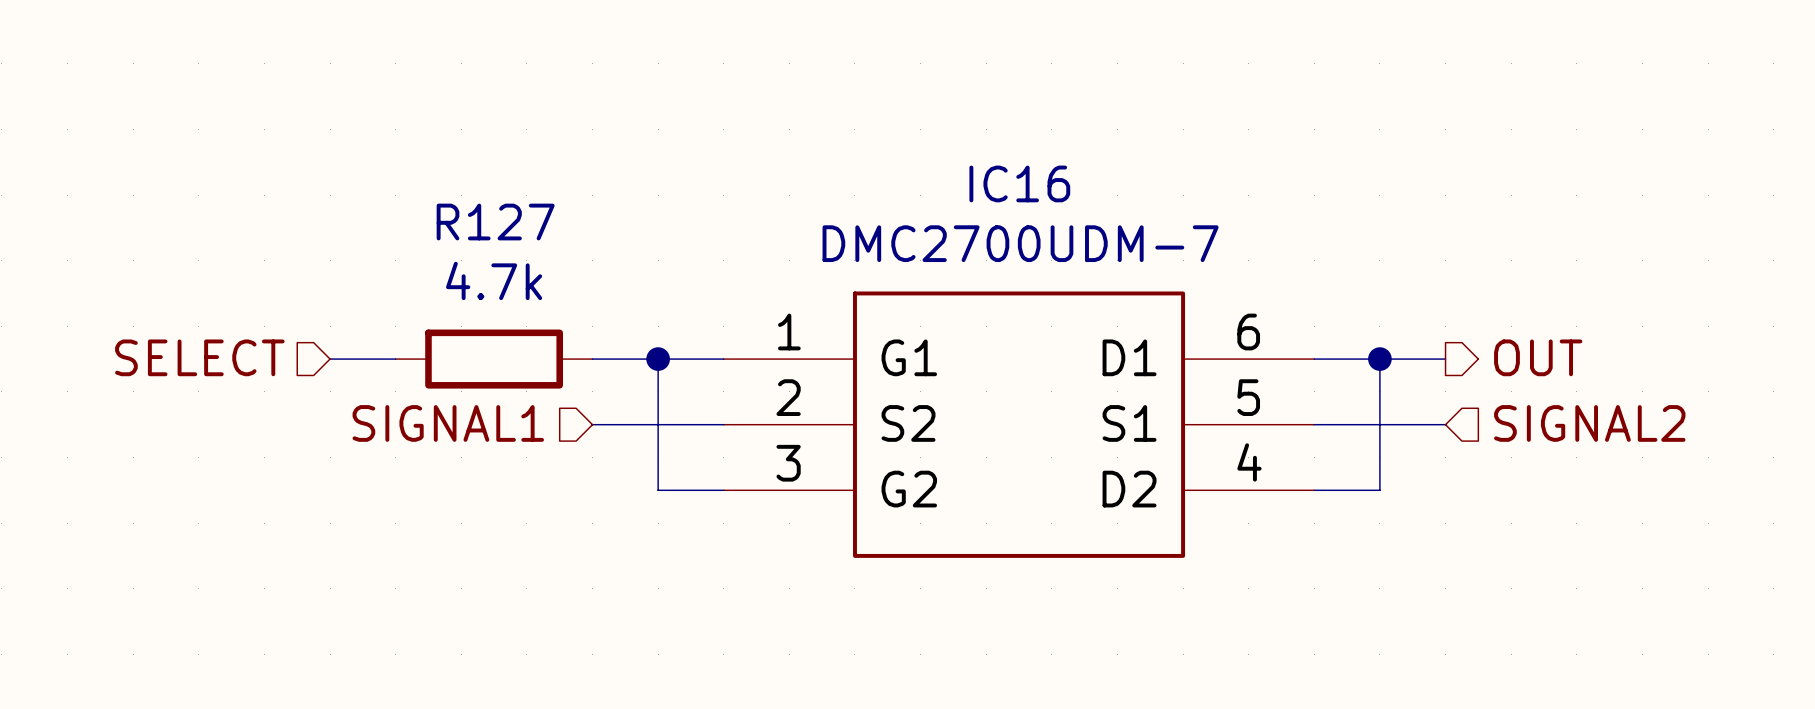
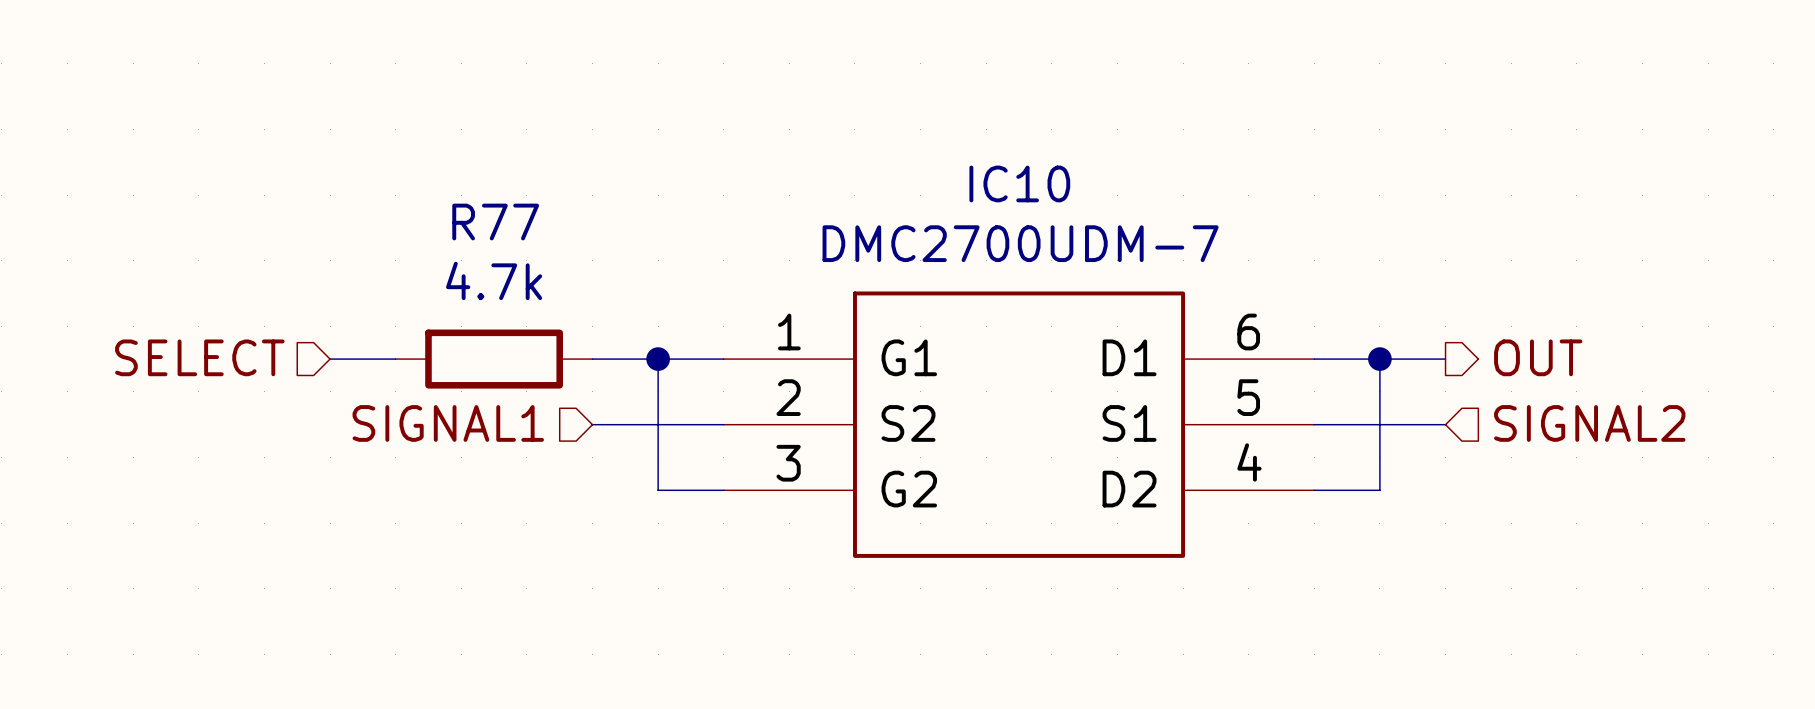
IC16 name: IC16 (1019, 183) -> IC10 (1019, 183)
R127 name: R127 (495, 222) -> R77 (495, 222)

